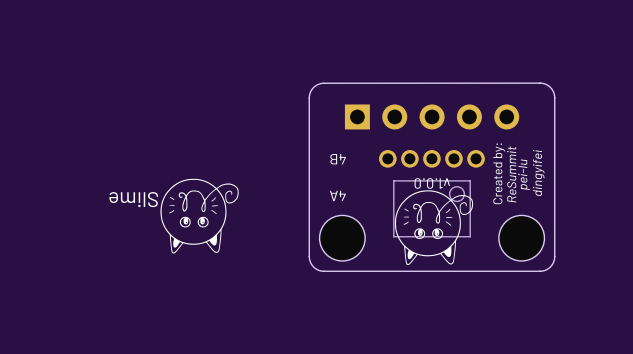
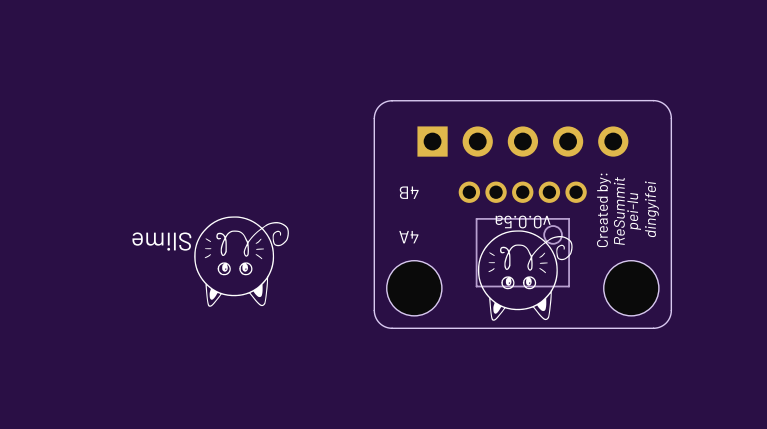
text: v1.0.0 (432, 183) -> v0.0.5a (523, 222)

